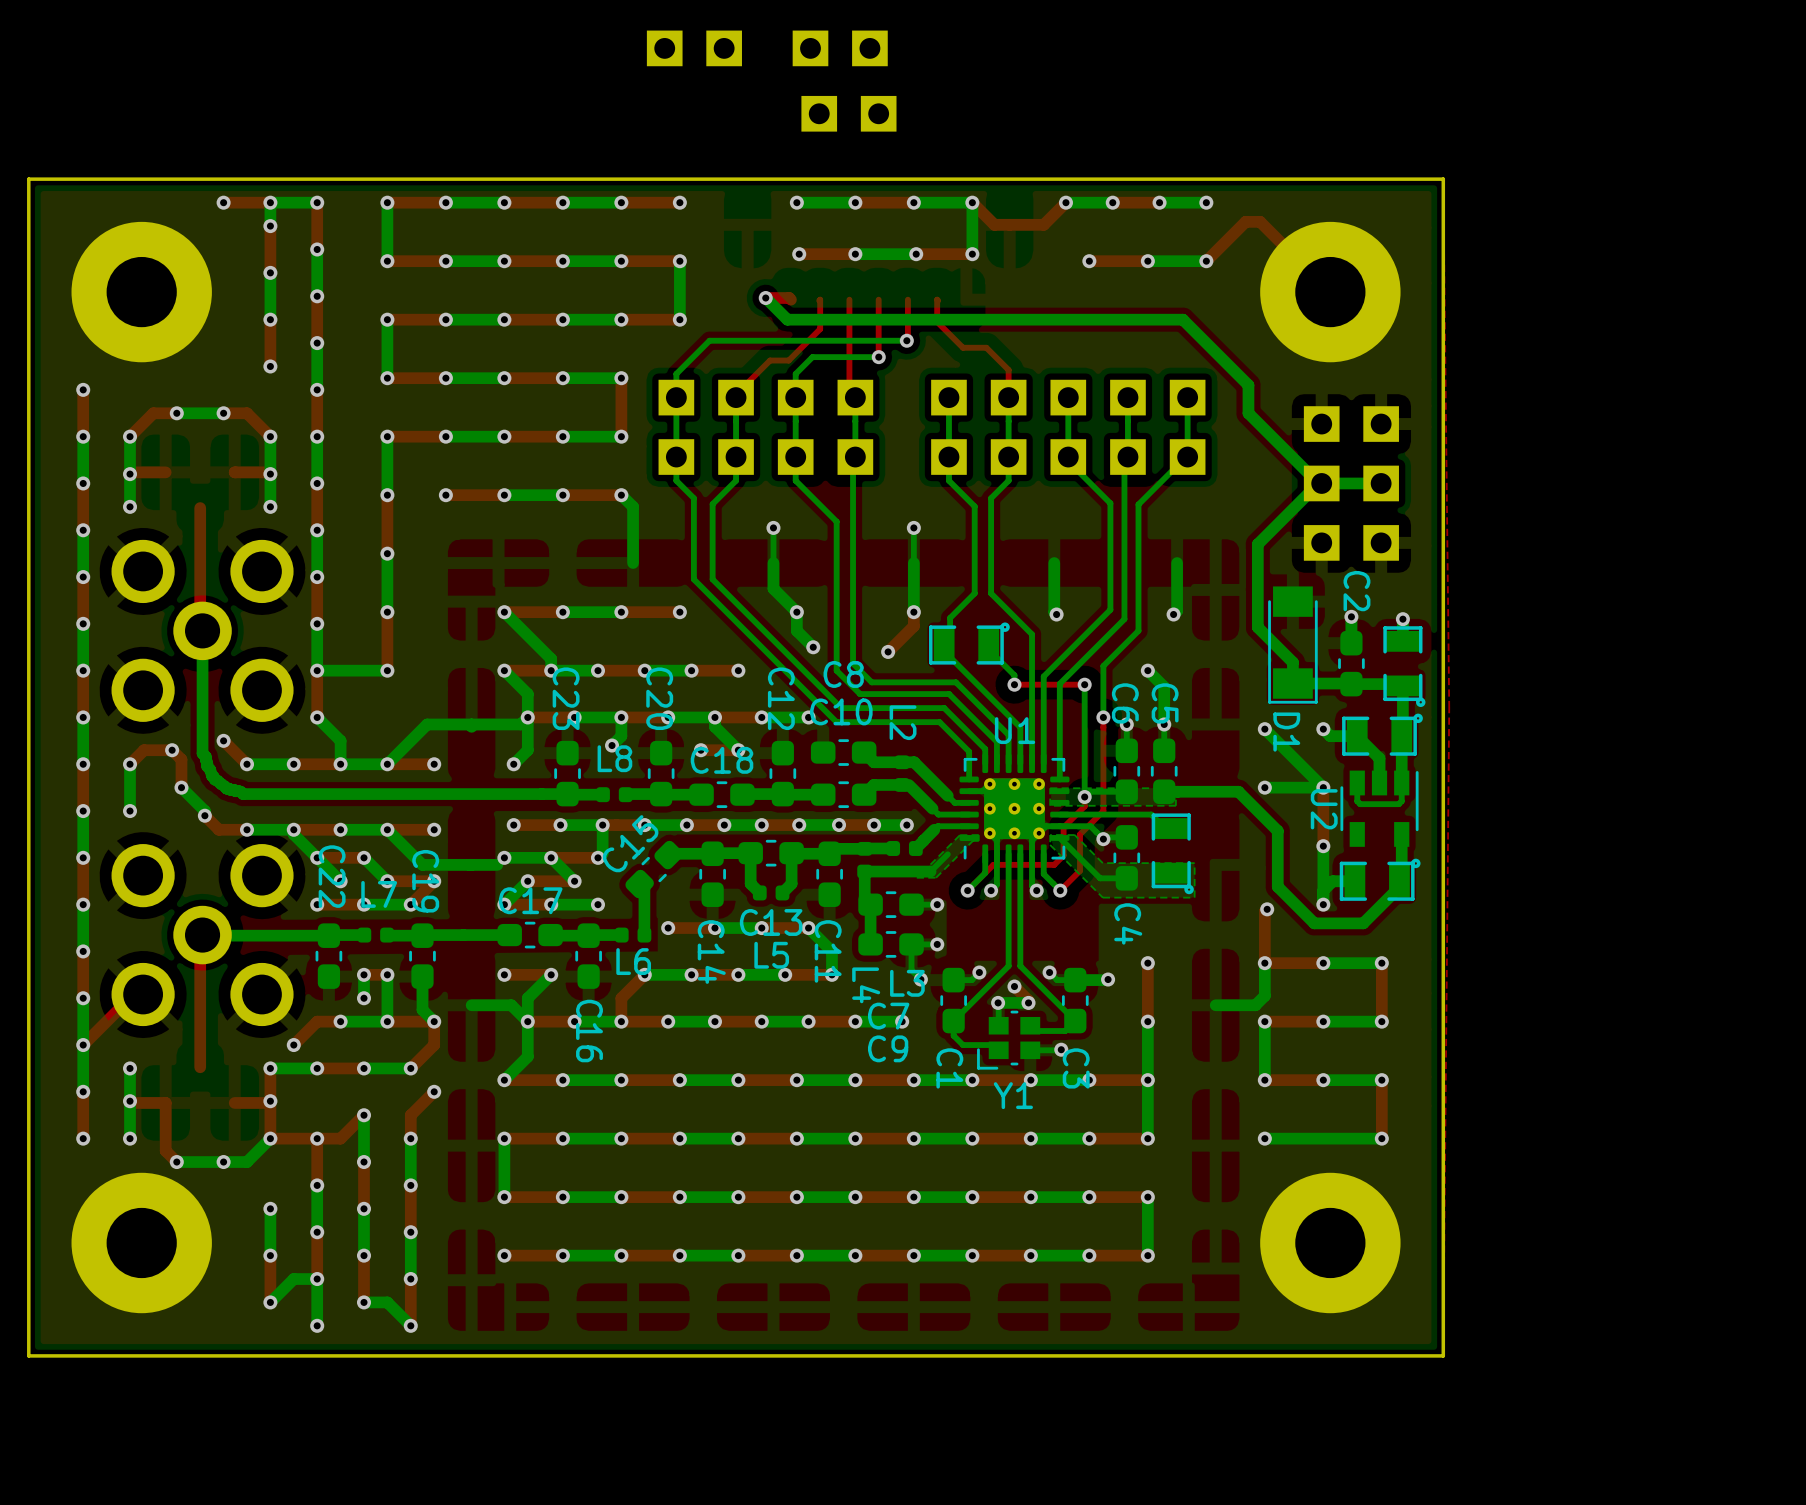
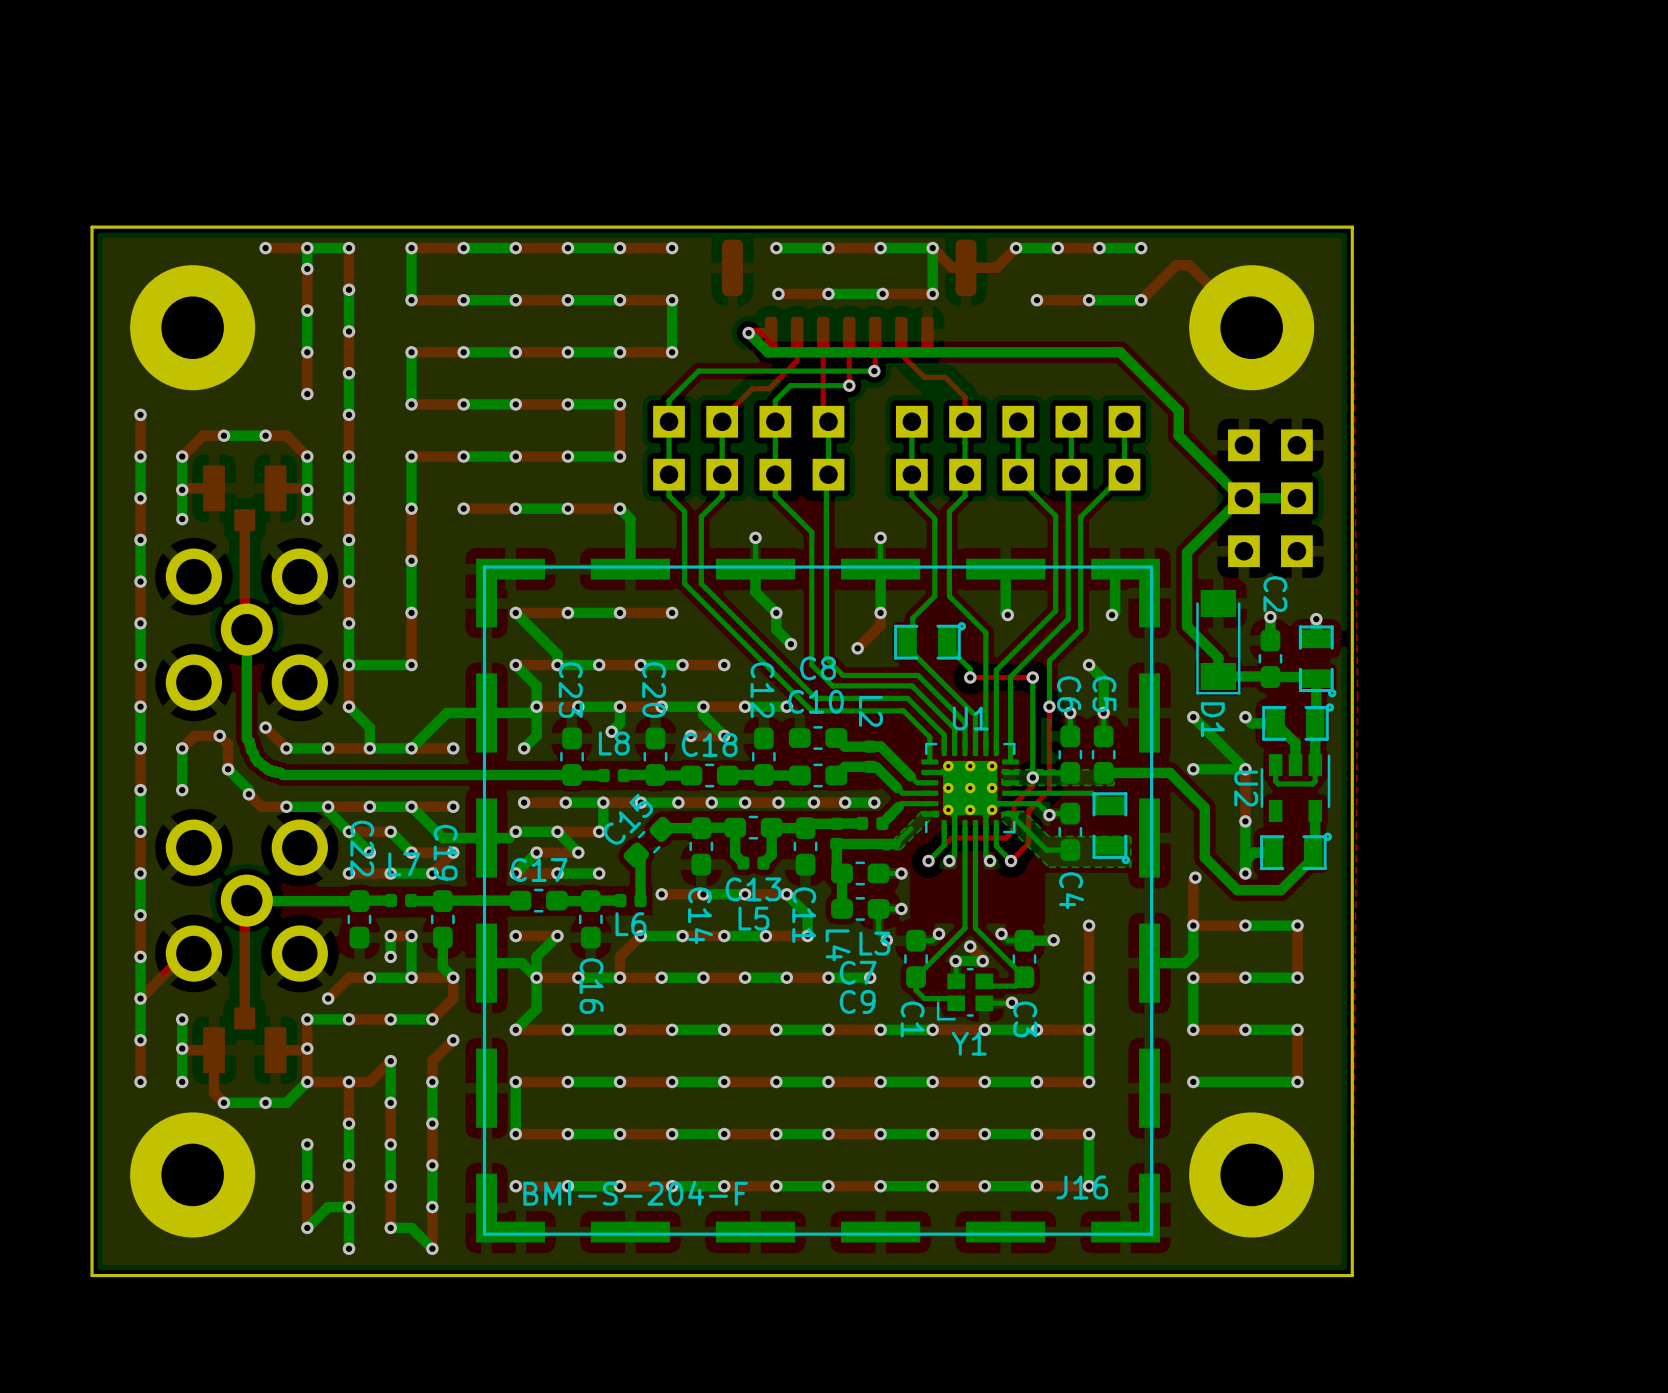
part: (694, 48) -> none
part: (840, 48) -> none
part: (848, 113) -> none
part: none -> (849, 295)
part: none -> (244, 498)
J16: none -> BMI-S-204-F (818, 900)
part: none -> (244, 1040)

